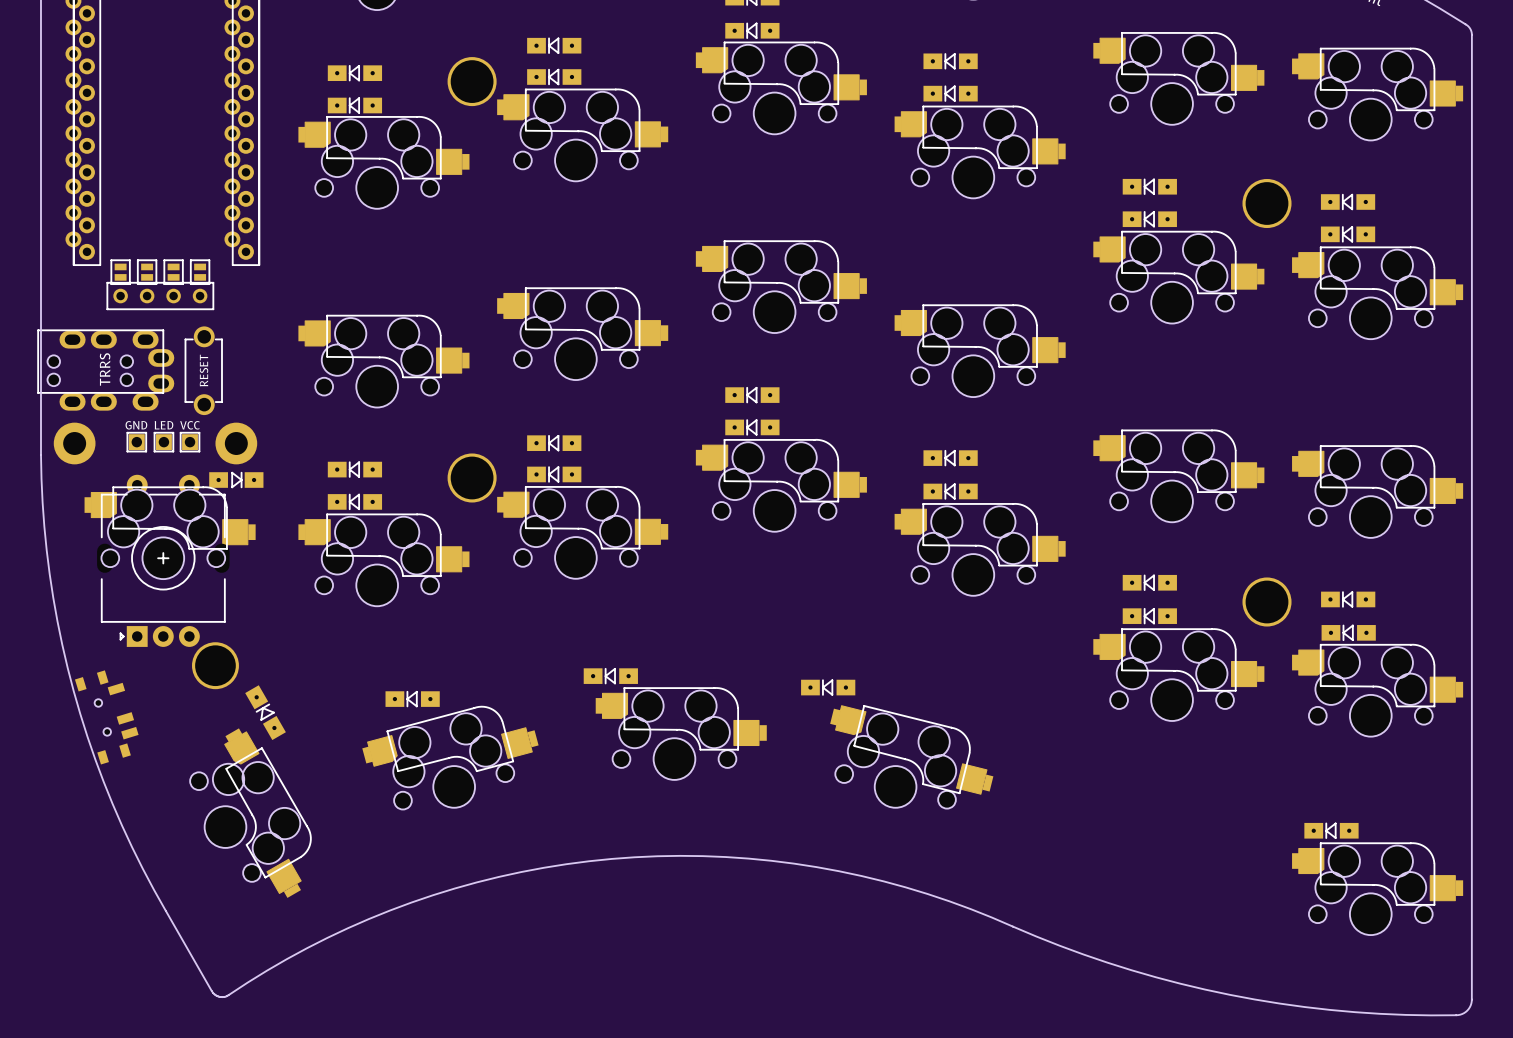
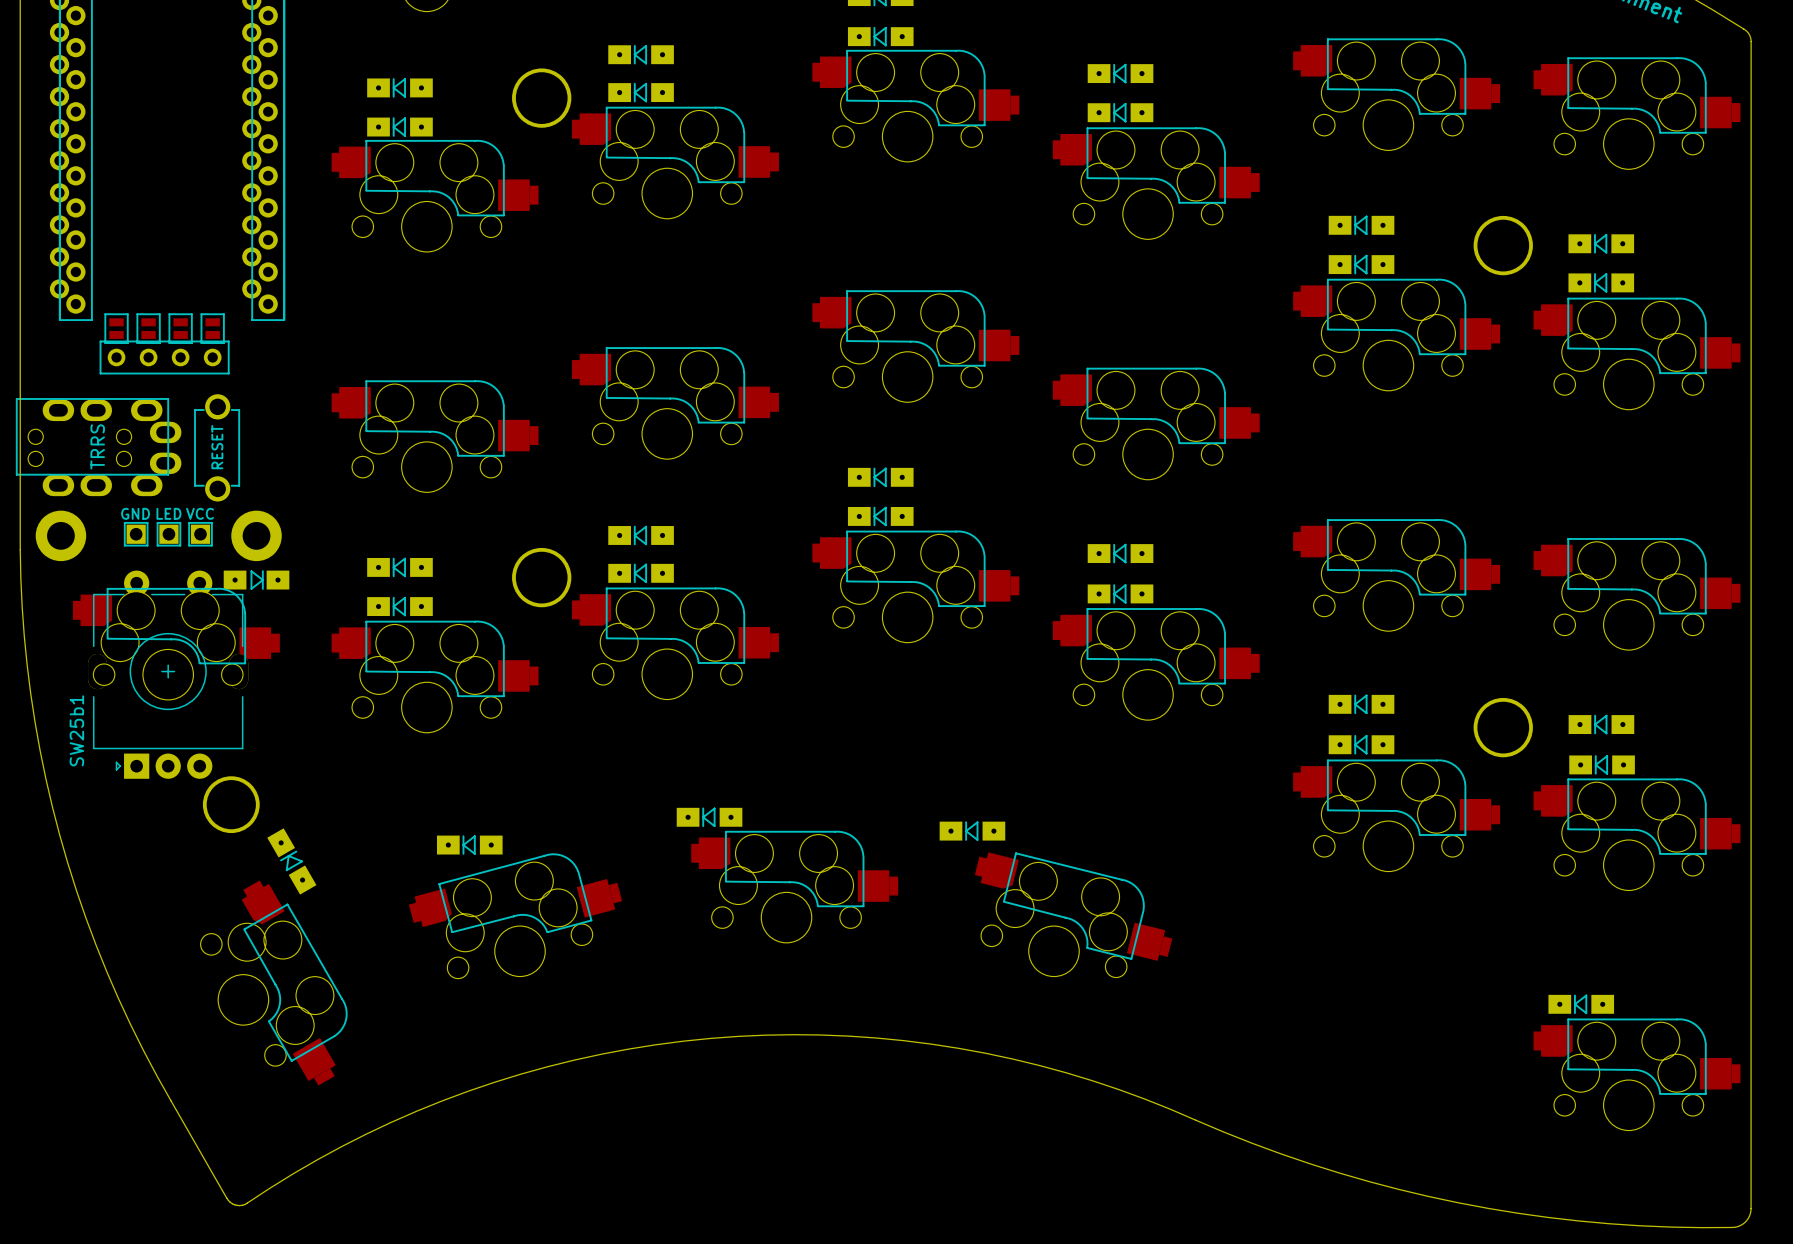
SW25b1: none -> (168, 674)
part: (163, 560) -> none
part: (106, 717) -> none

